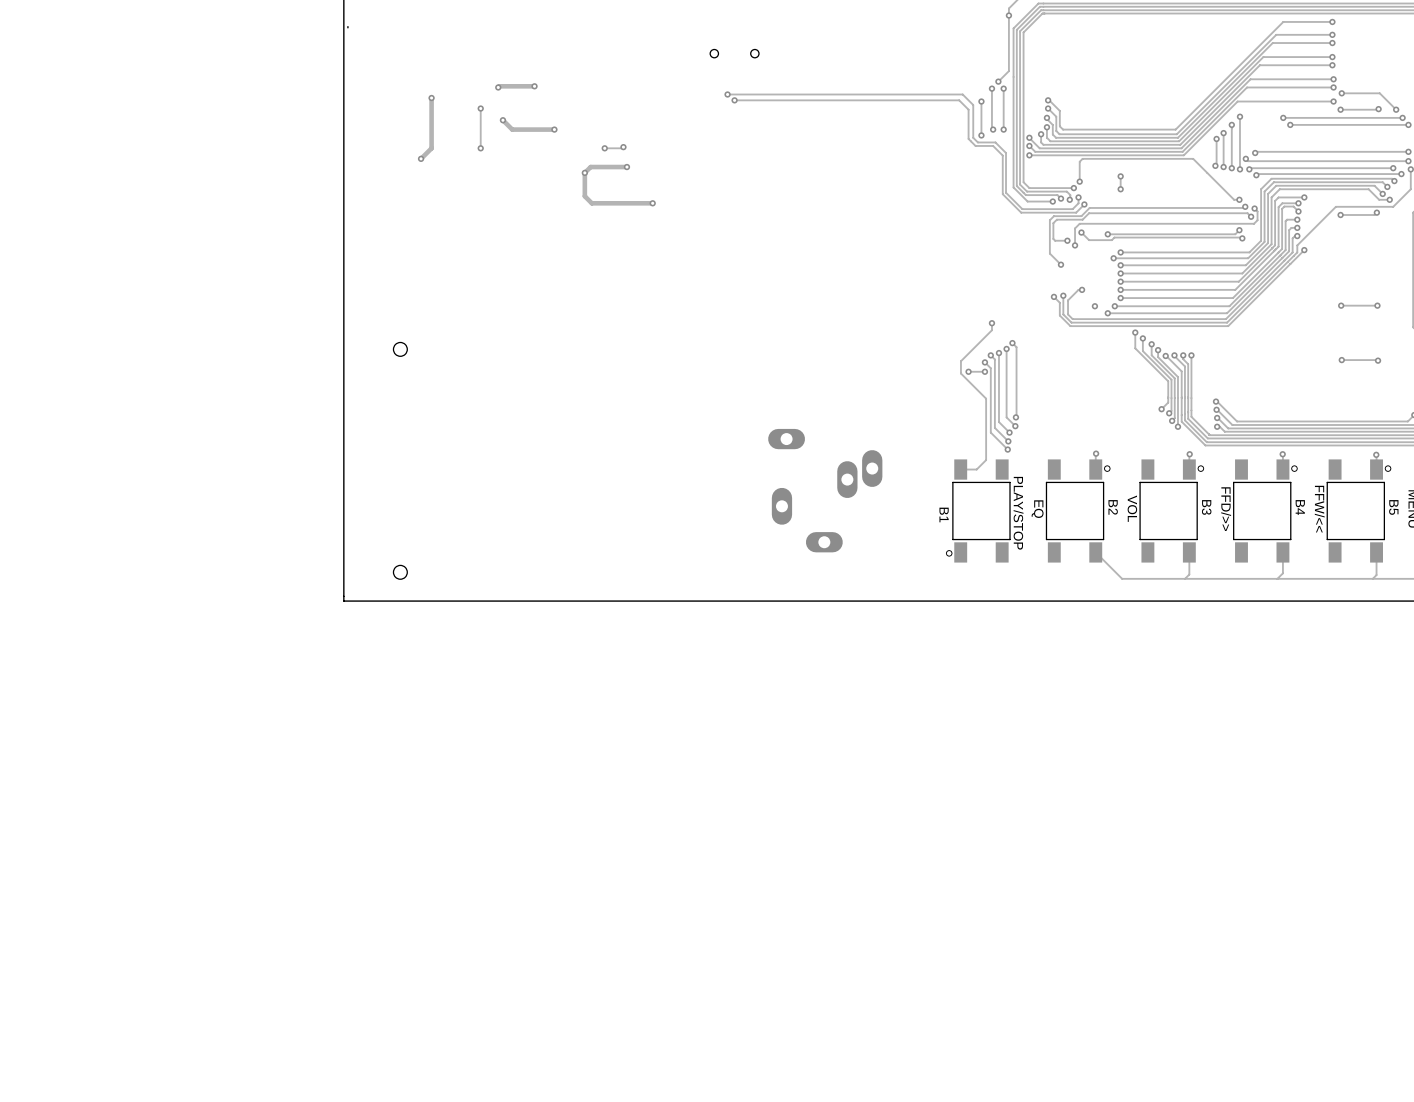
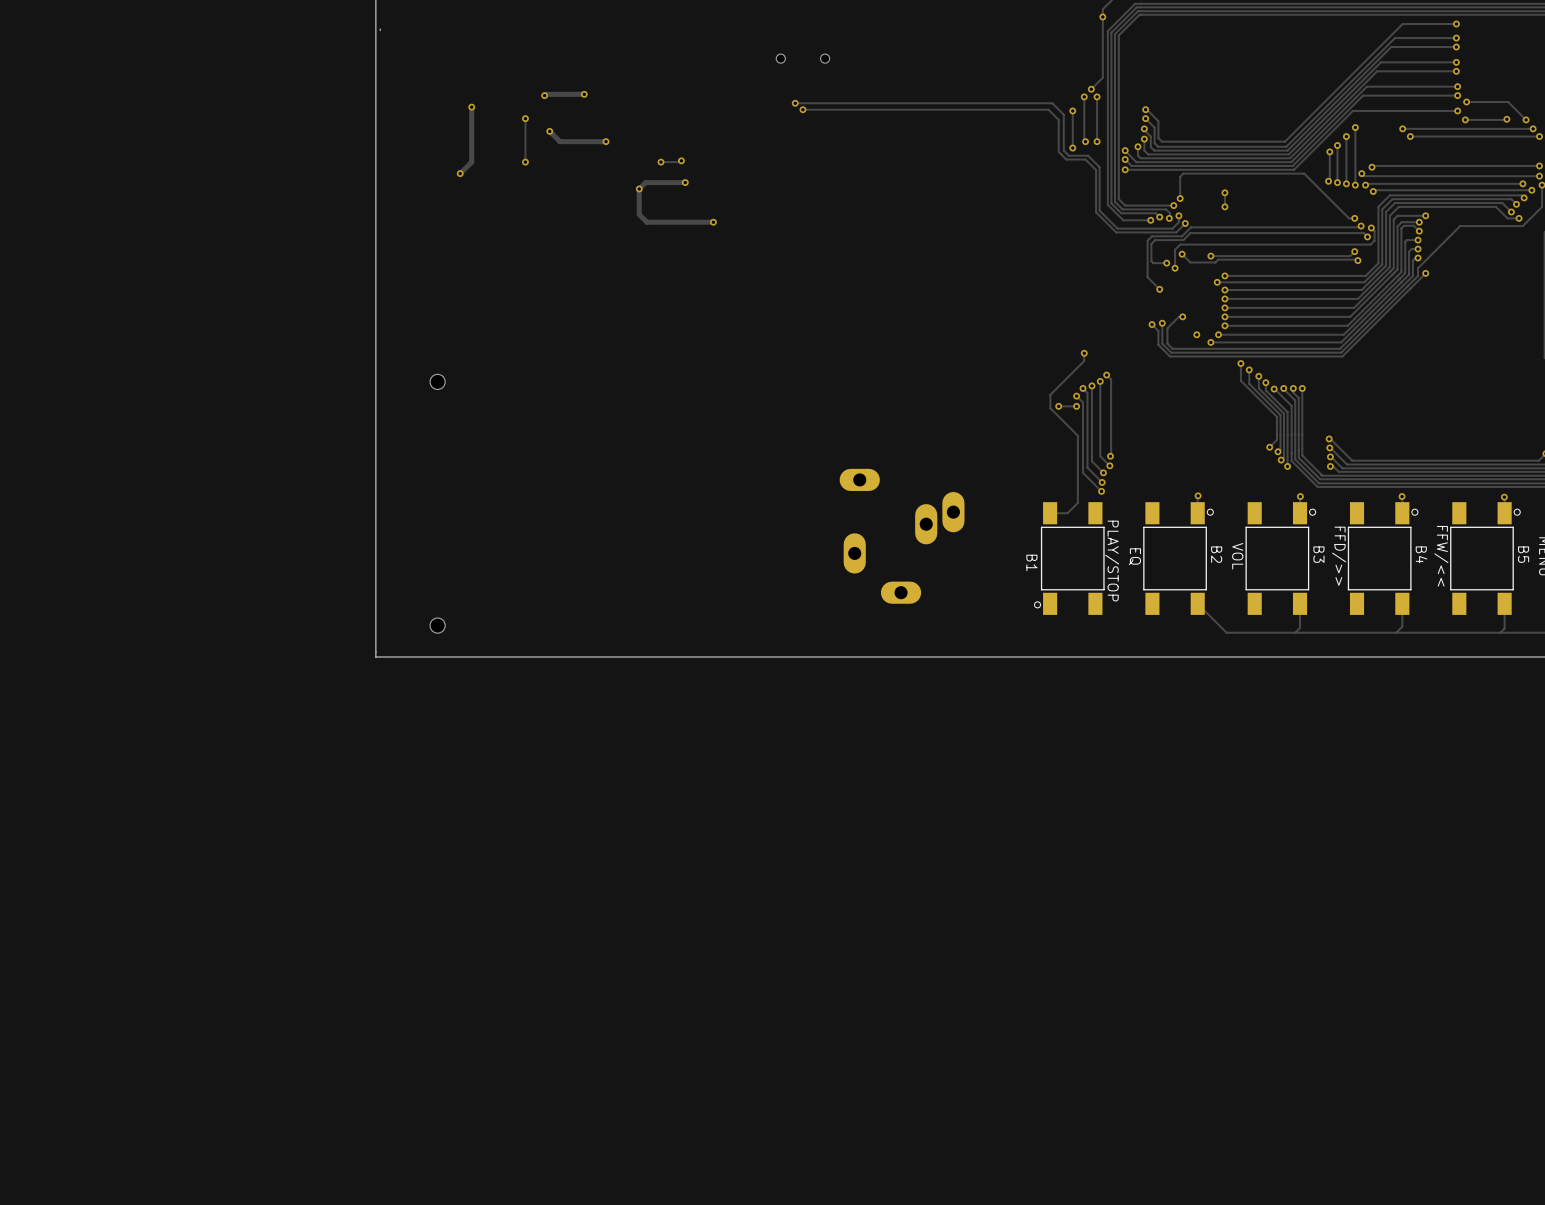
track: (1376, 212) (1374, 215) (1340, 215) -> none
via: (1376, 212) -> none
via: (1340, 215) -> none
via: (1341, 305) -> none
track: (1377, 305) (1341, 305) -> none
via: (1377, 305) -> none
track: (1341, 360) (1378, 360) -> none
via: (1341, 360) -> none
via: (1378, 360) -> none

